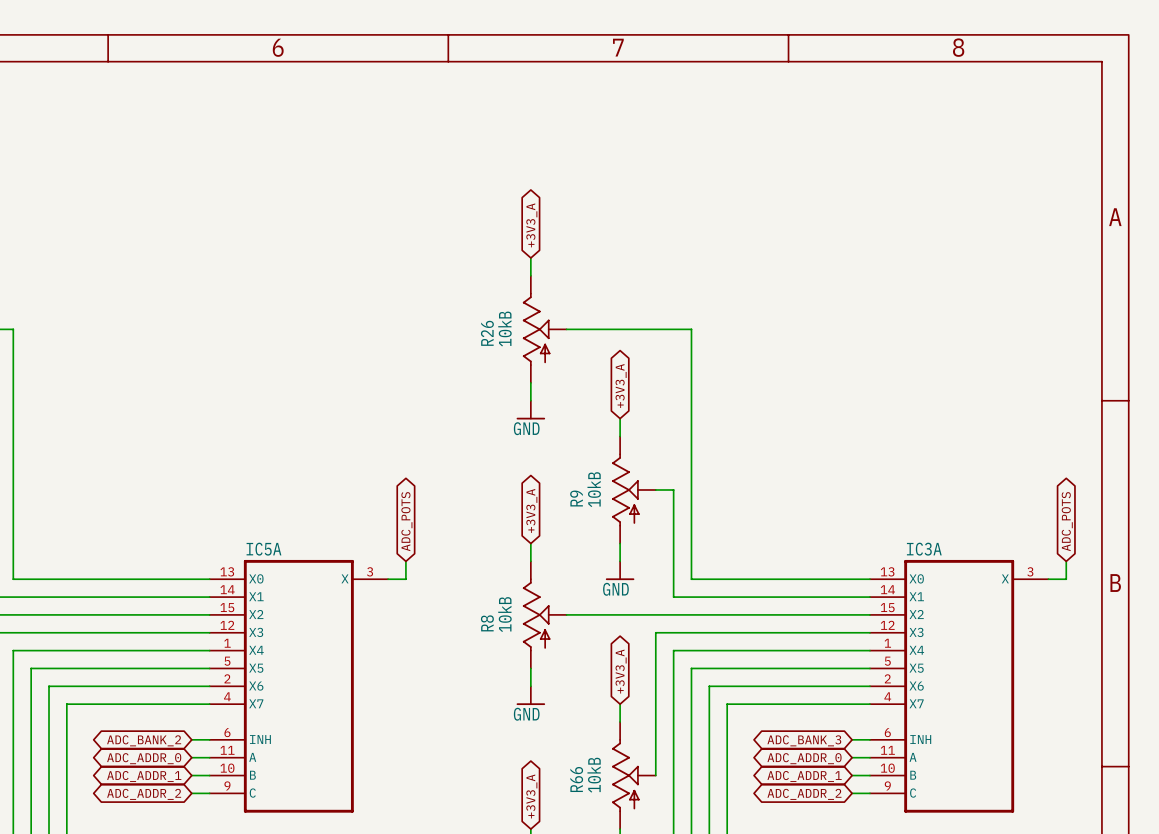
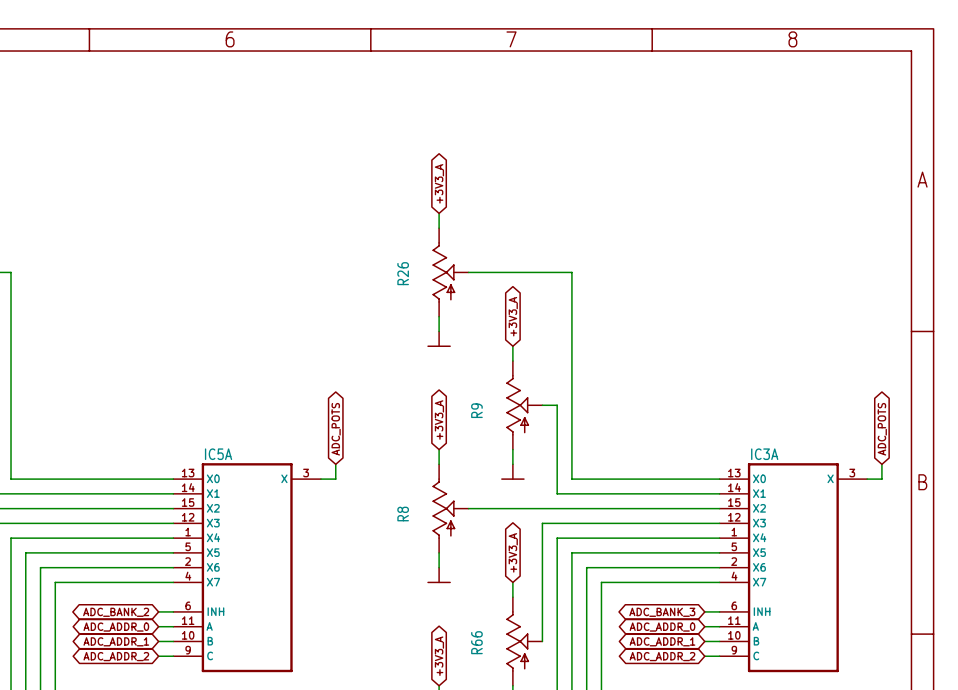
R26 value: 10kB (504, 328) -> none
power symbol text: GND (526, 428) -> none
R9 value: 10kB (594, 489) -> none
power symbol text: GND (615, 589) -> none
R8 value: 10kB (504, 614) -> none
power symbol text: GND (526, 714) -> none
R66 value: 10kB (594, 775) -> none

